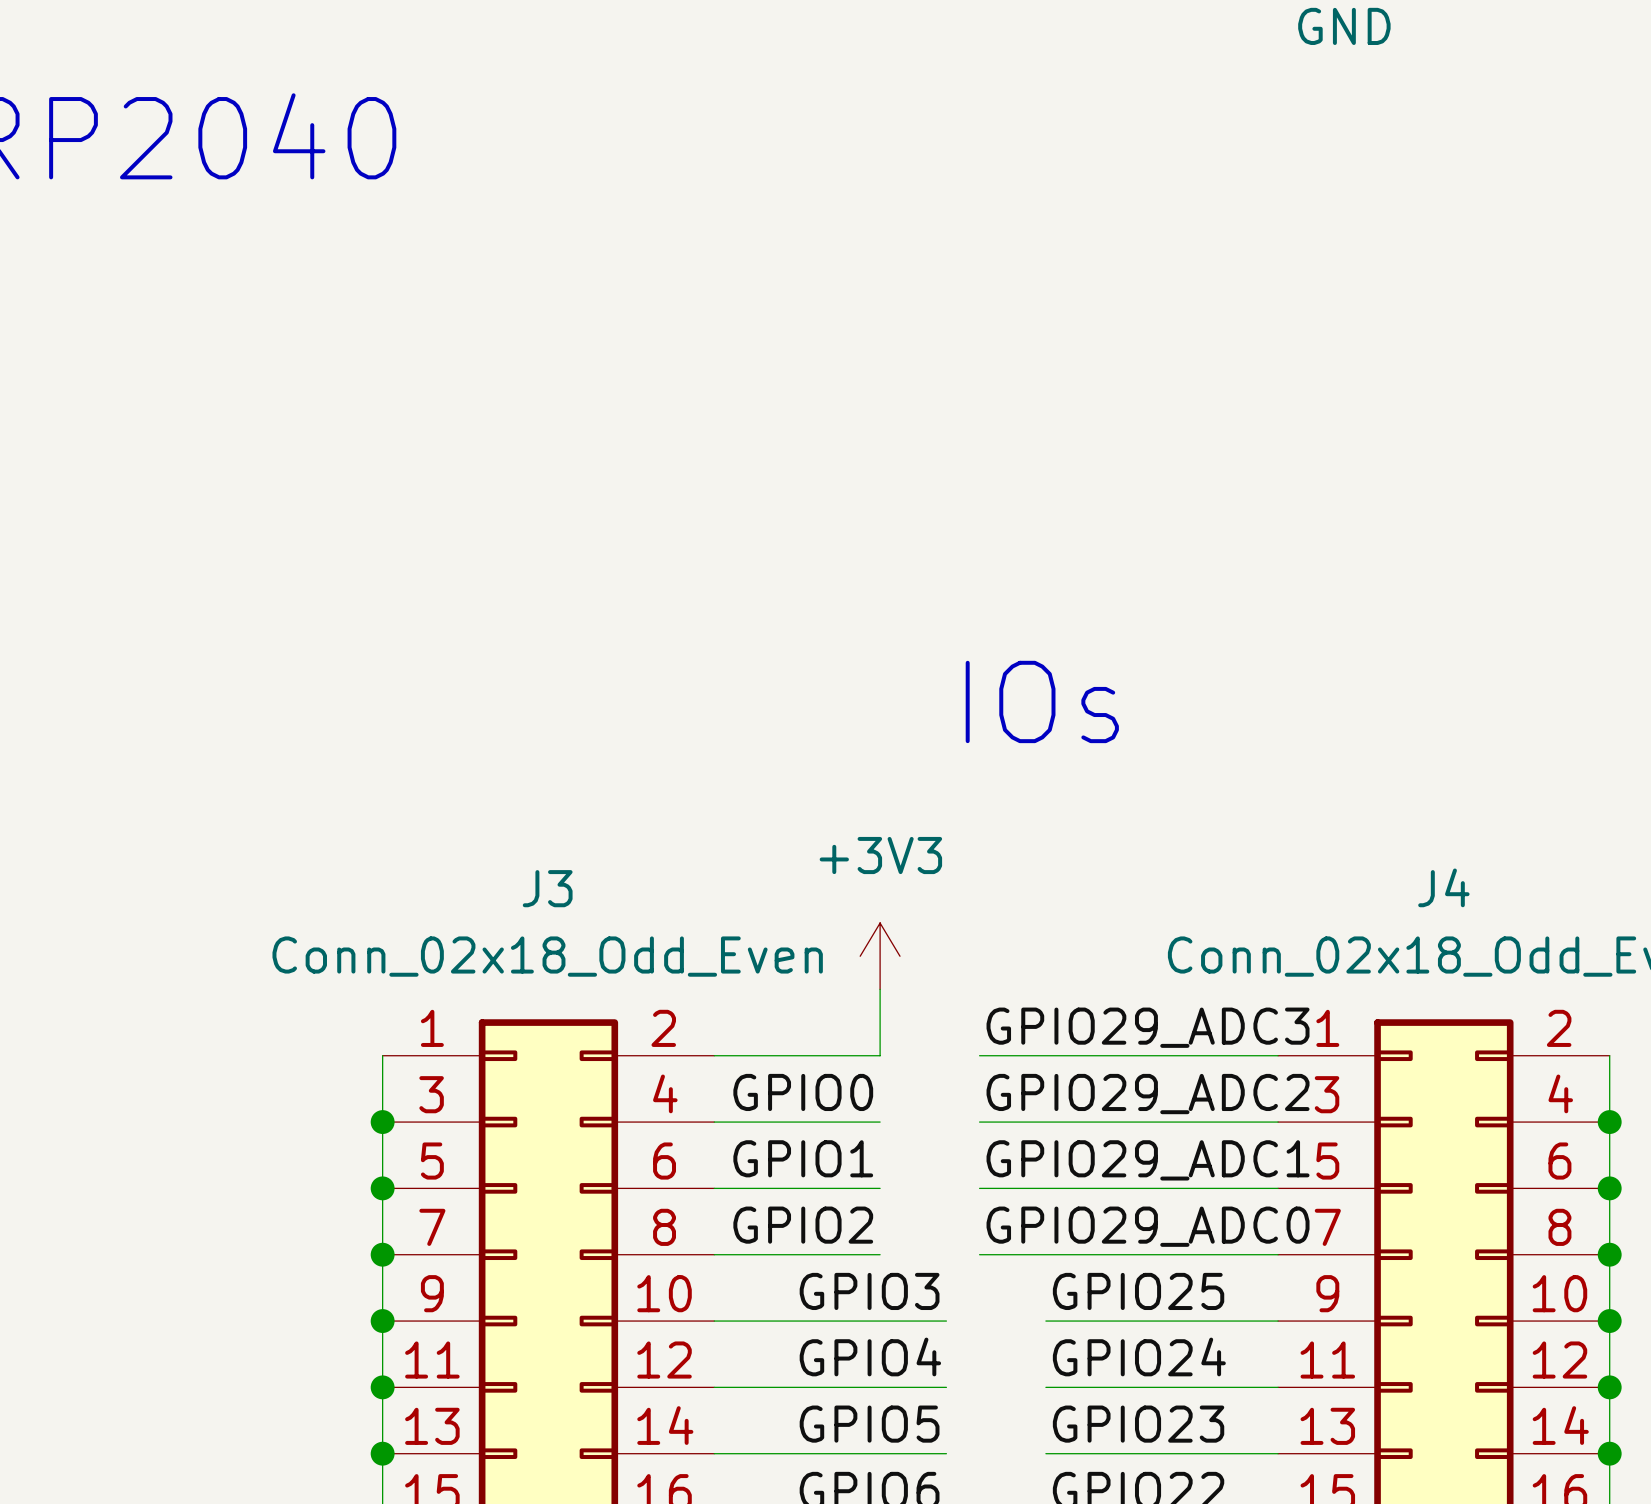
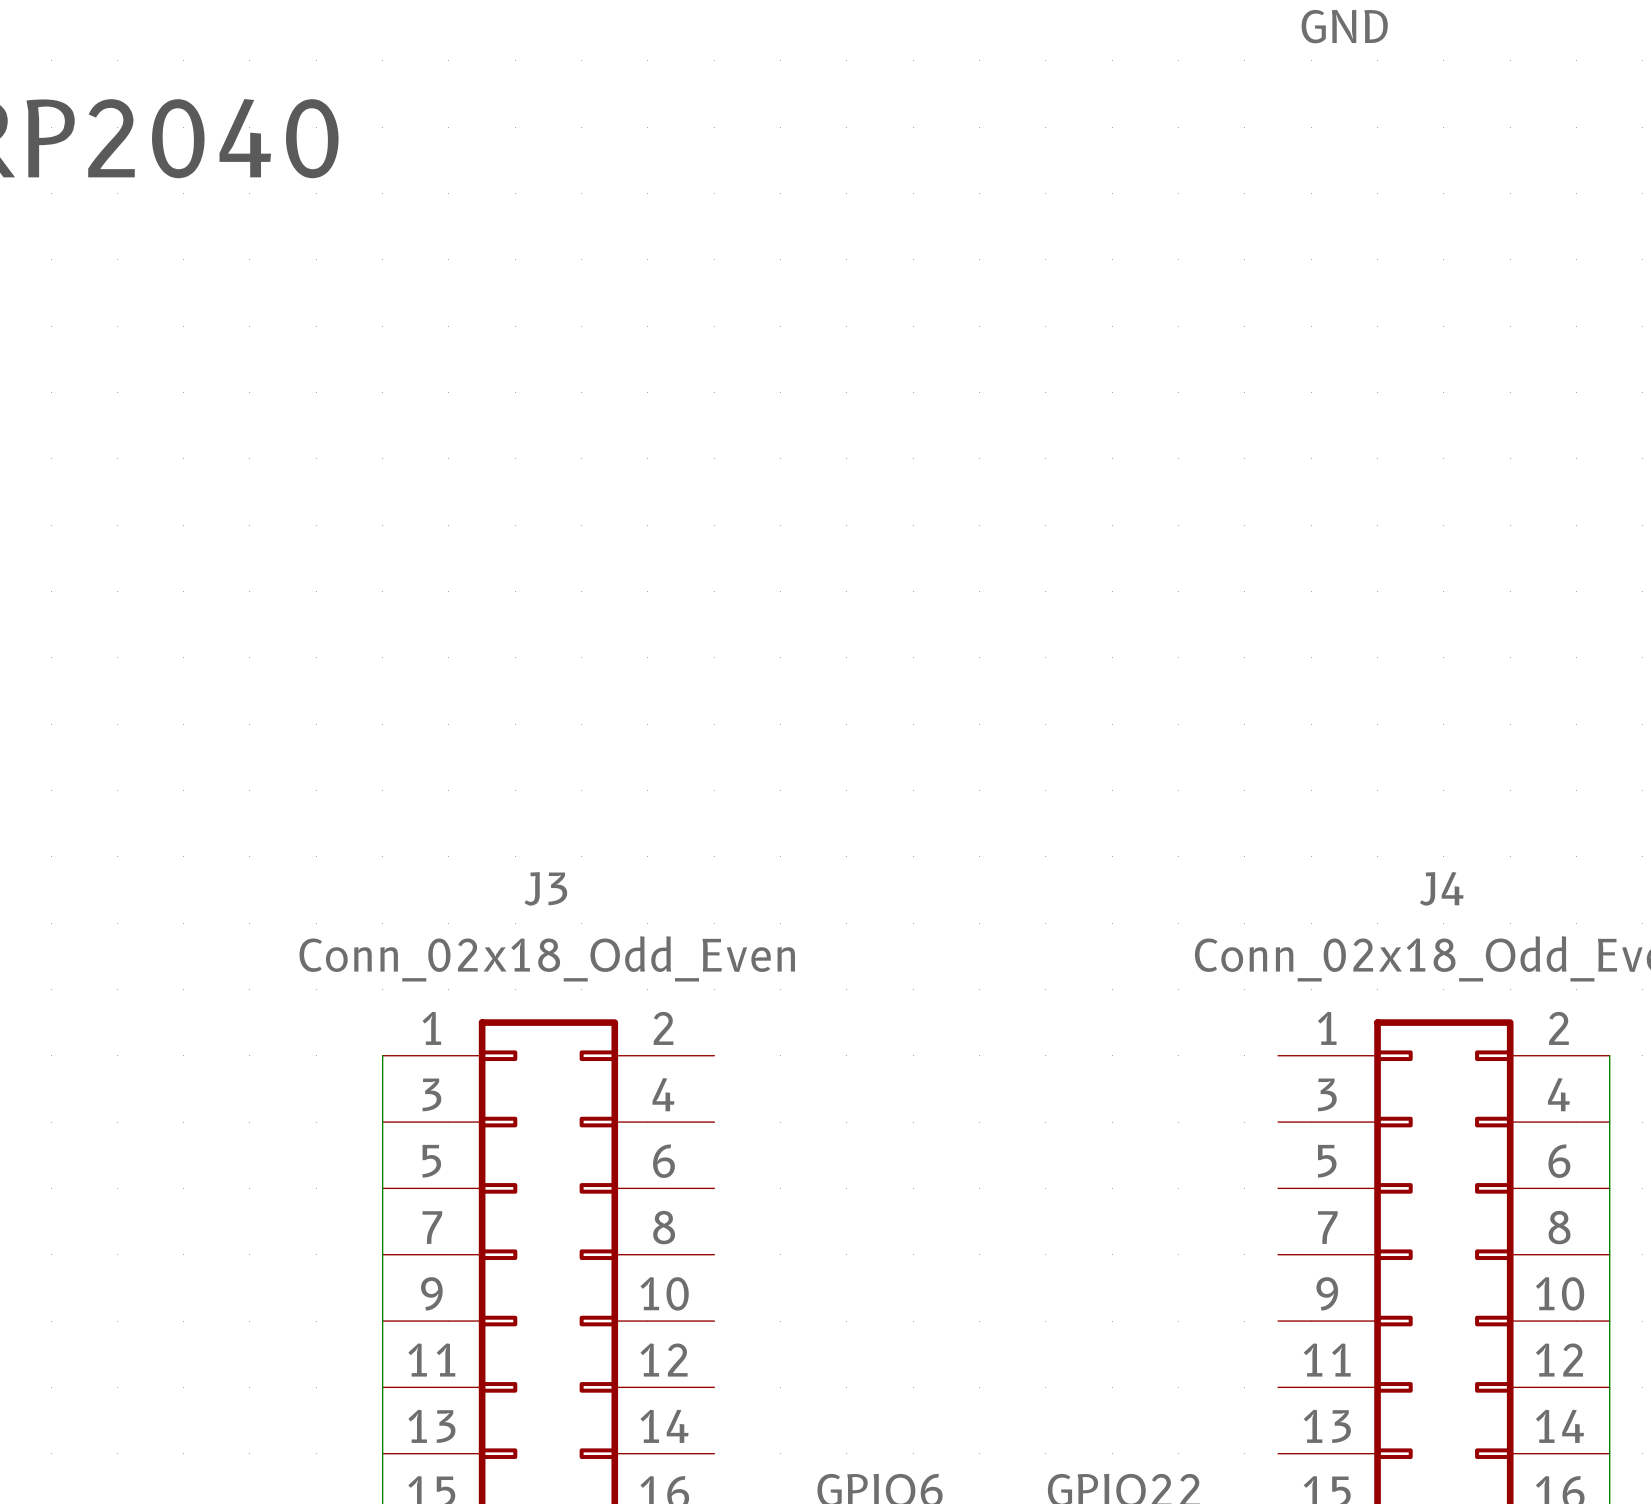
text: IOs (1042, 701) -> none
power symbol: +3V3 (880, 956) -> none
wire: (880, 989) (880, 1055) (714, 1055) -> none
label: GPIO29_ADC3 (1148, 1027) -> none
wire: (979, 1055) (1278, 1055) -> none
label: GPIO0 (803, 1092) -> none
label: GPIO29_ADC2 (1148, 1094) -> none
junction: (382, 1122) -> none
wire: (714, 1122) (880, 1122) -> none
wire: (979, 1122) (1278, 1122) -> none
junction: (1609, 1122) -> none
label: GPIO1 (803, 1158) -> none
label: GPIO29_ADC1 (1148, 1160) -> none
junction: (382, 1188) -> none
wire: (714, 1188) (880, 1188) -> none
wire: (979, 1188) (1278, 1188) -> none
junction: (1609, 1188) -> none
label: GPIO2 (803, 1225) -> none
label: GPIO29_ADC0 (1148, 1226) -> none
junction: (382, 1254) -> none
wire: (714, 1254) (880, 1254) -> none
wire: (979, 1254) (1278, 1254) -> none
junction: (1609, 1254) -> none
label: GPIO3 (869, 1291) -> none
label: GPIO25 (1138, 1291) -> none
junction: (382, 1321) -> none
wire: (714, 1321) (946, 1321) -> none
wire: (1045, 1321) (1278, 1321) -> none
junction: (1609, 1321) -> none
label: GPIO4 (870, 1356) -> none
label: GPIO24 (1139, 1356) -> none
junction: (382, 1387) -> none
wire: (714, 1387) (946, 1387) -> none
wire: (1045, 1387) (1278, 1387) -> none
junction: (1609, 1387) -> none
label: GPIO5 (869, 1424) -> none
label: GPIO23 (1138, 1424) -> none
junction: (382, 1453) -> none
wire: (714, 1453) (946, 1453) -> none
wire: (1045, 1453) (1278, 1453) -> none
junction: (1609, 1453) -> none

